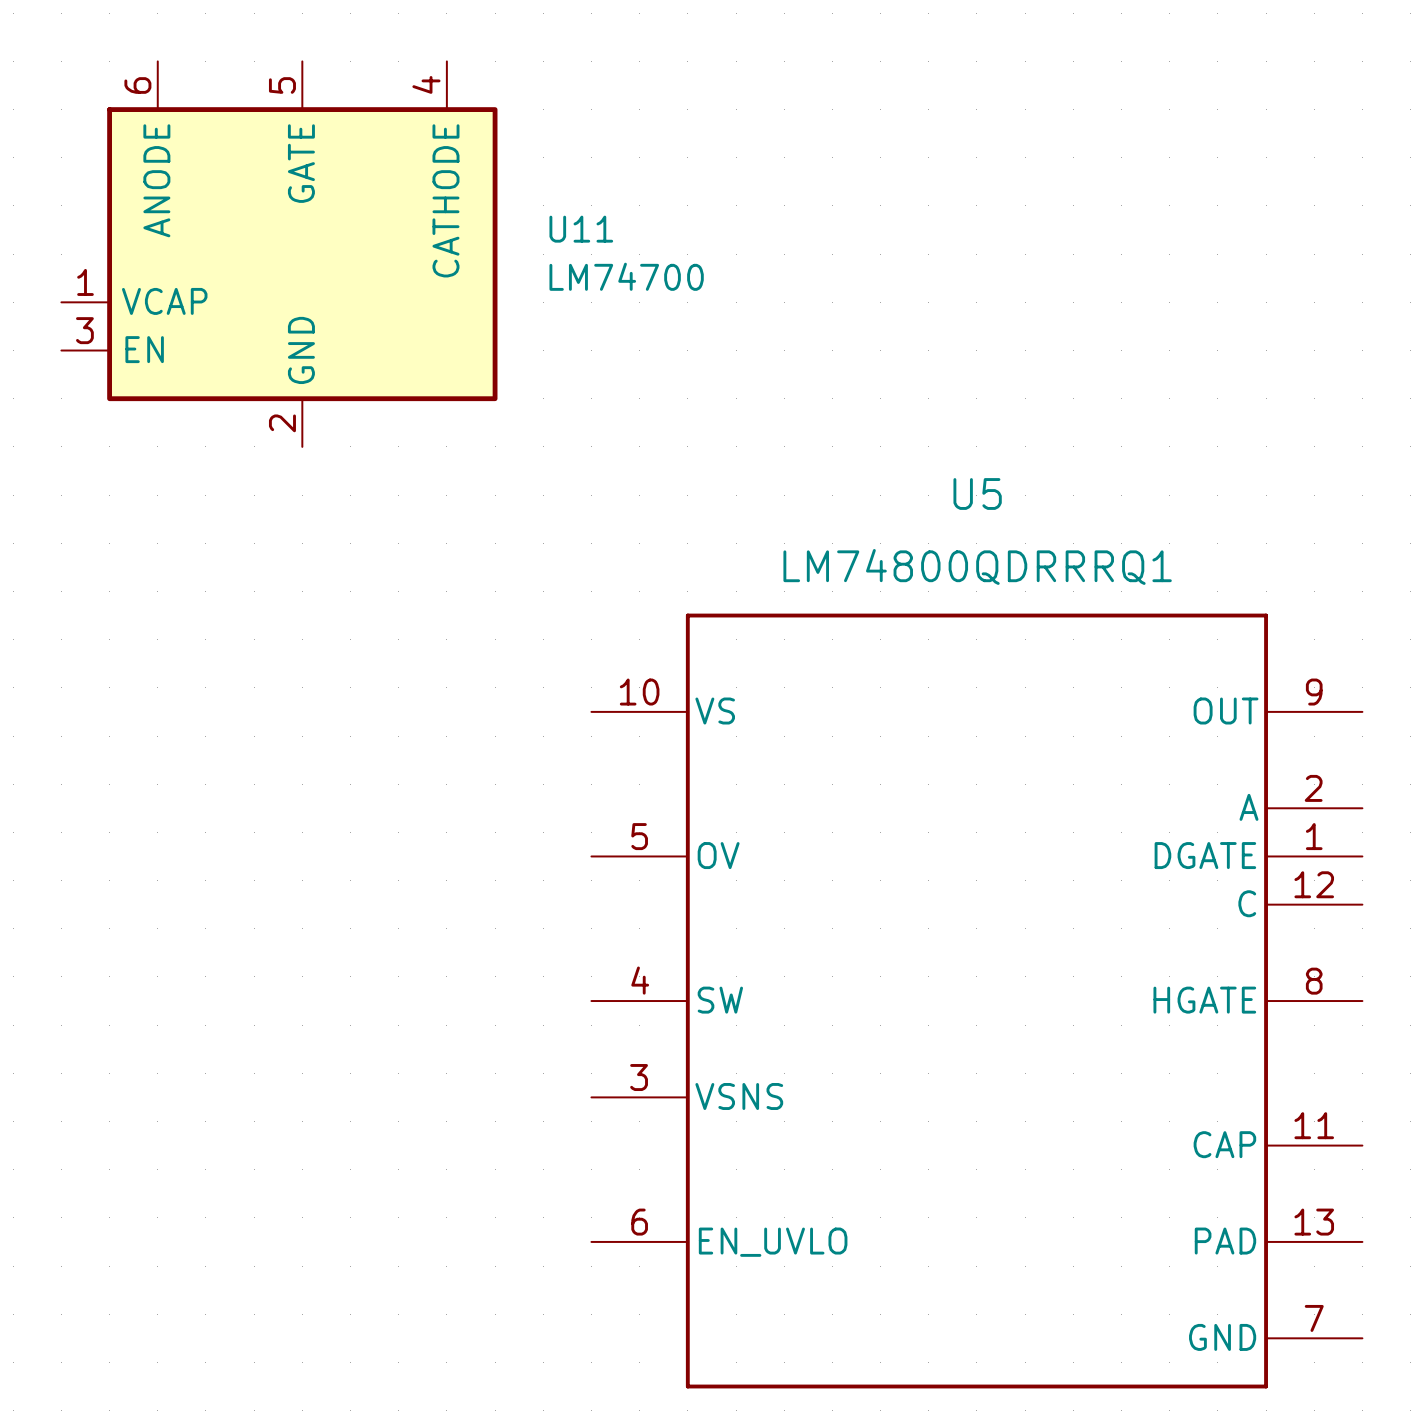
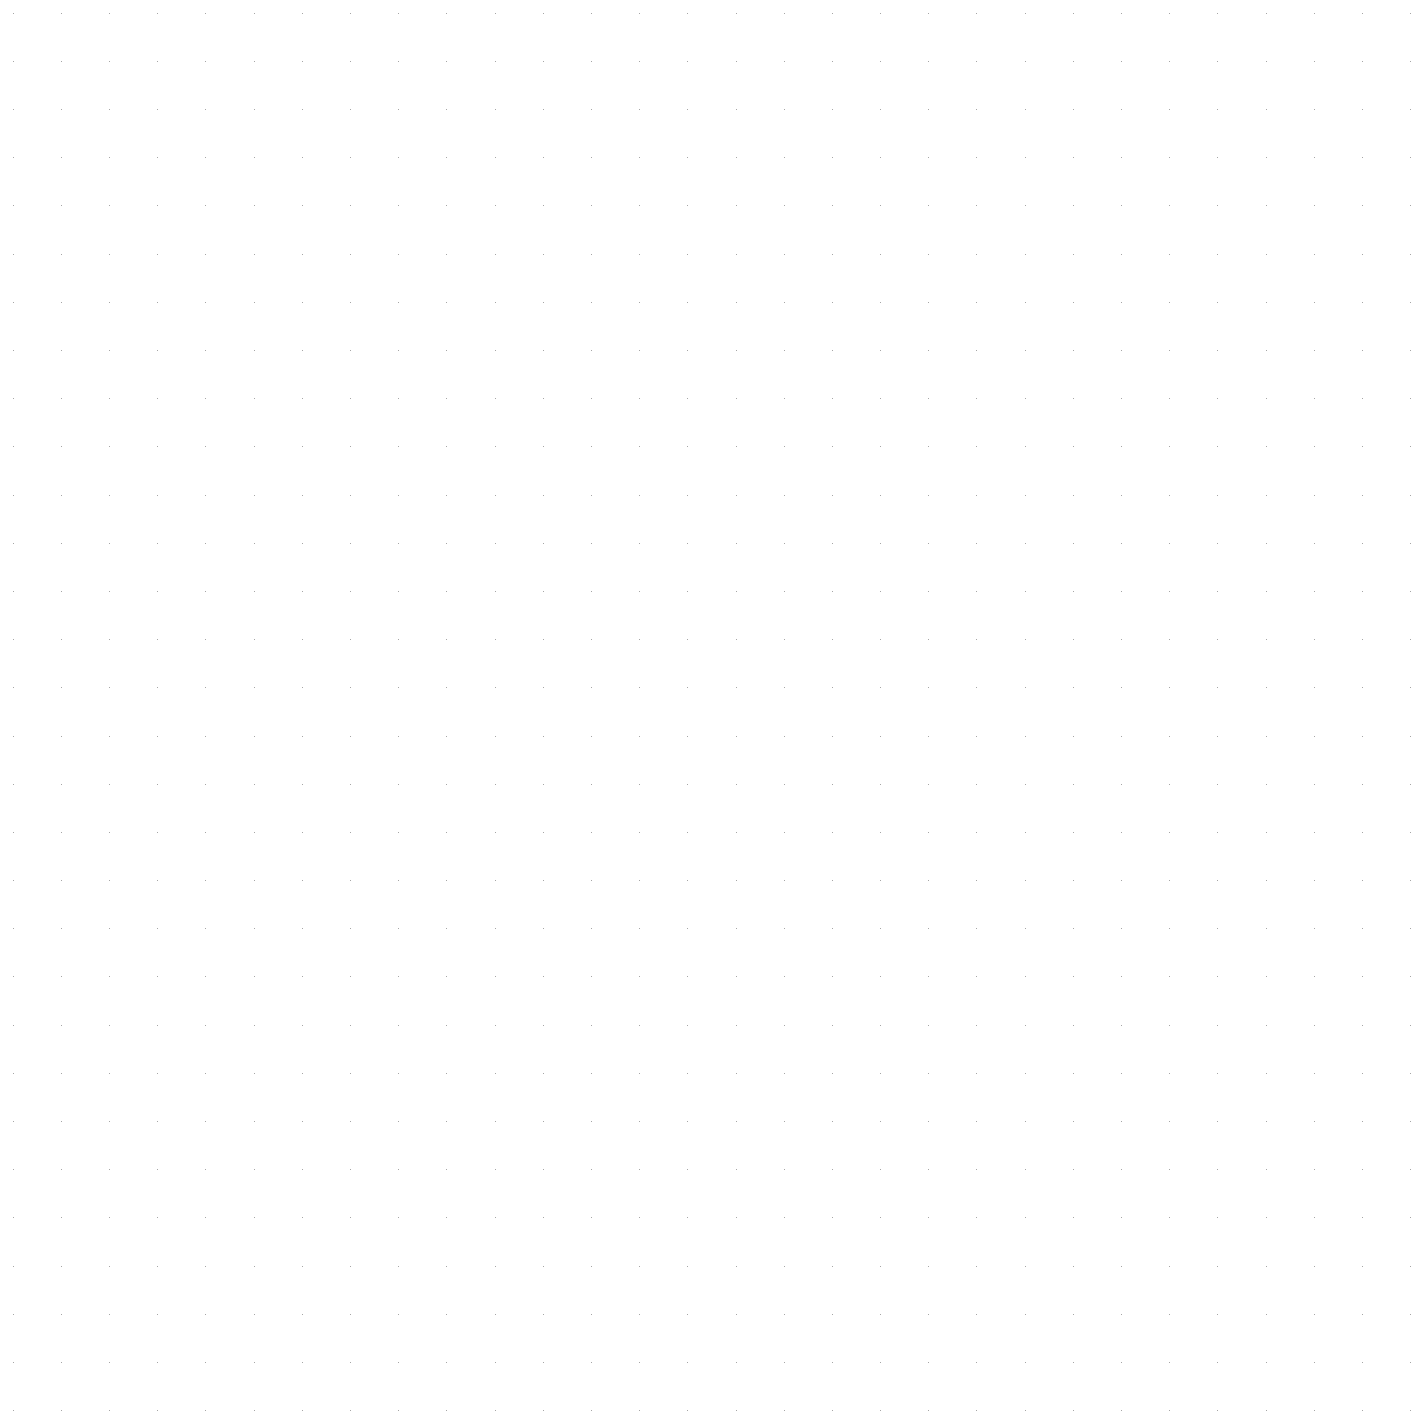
U11: LM74700 (279, 254) -> none
U5: LM74800QDRRRQ1 (976, 1001) -> none

